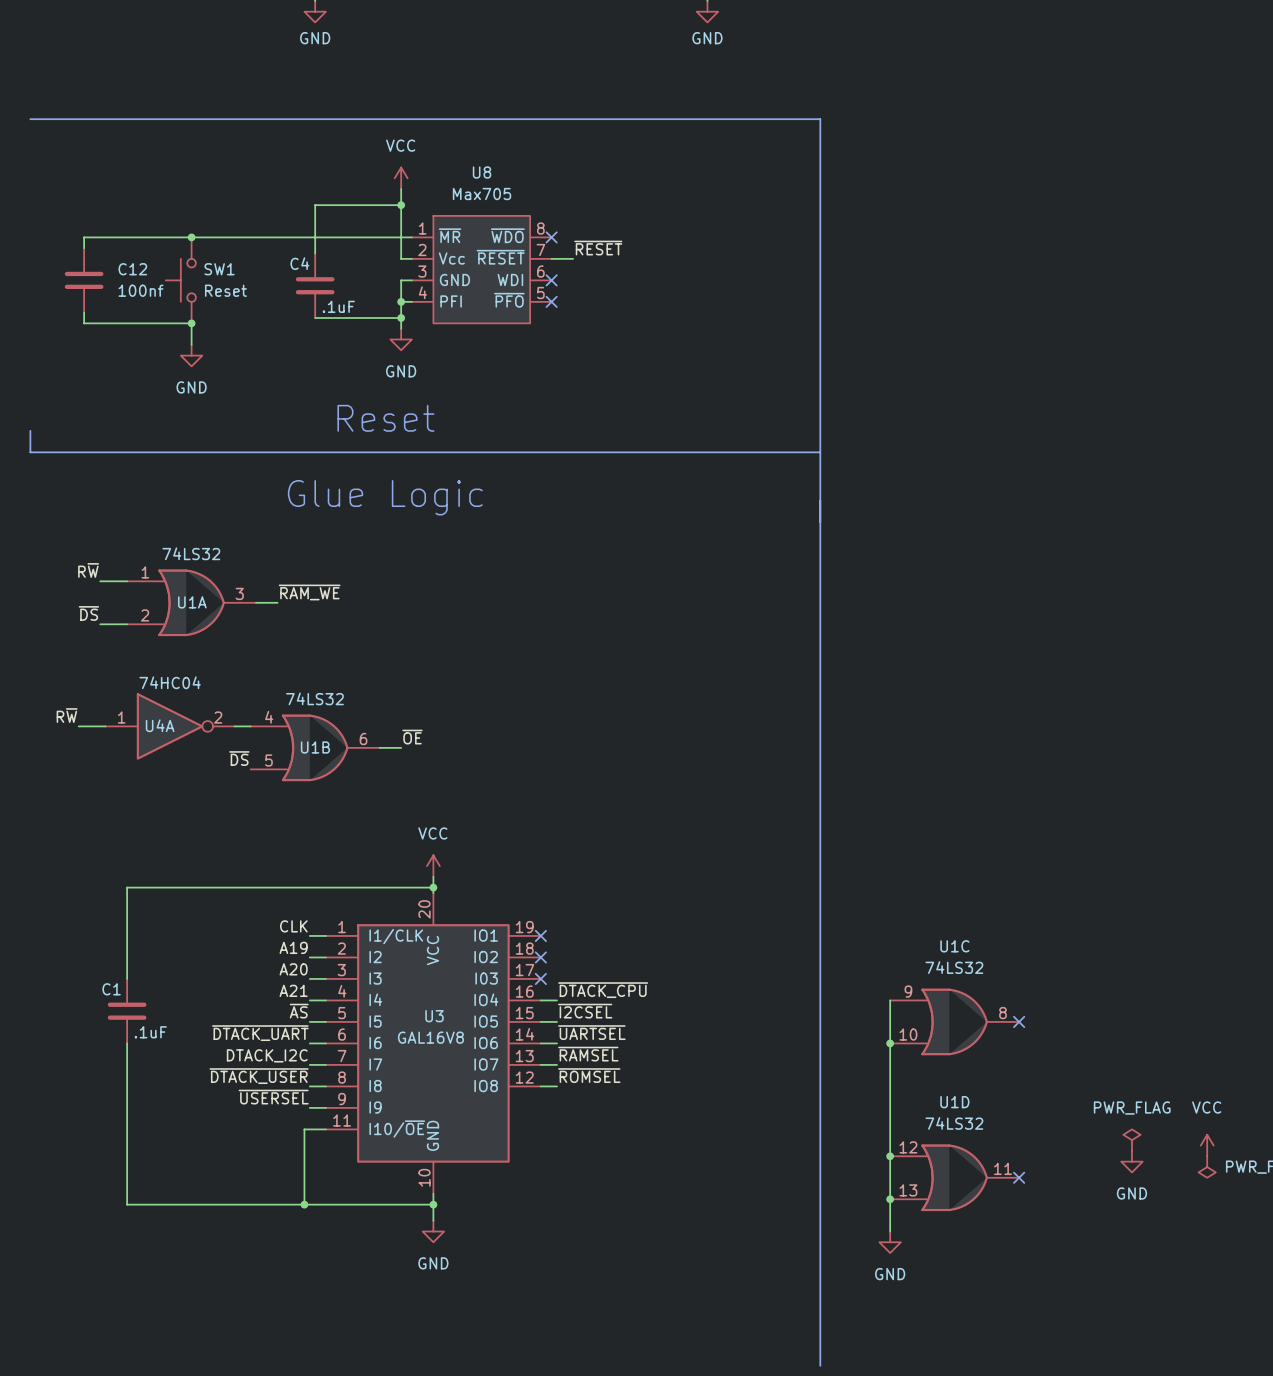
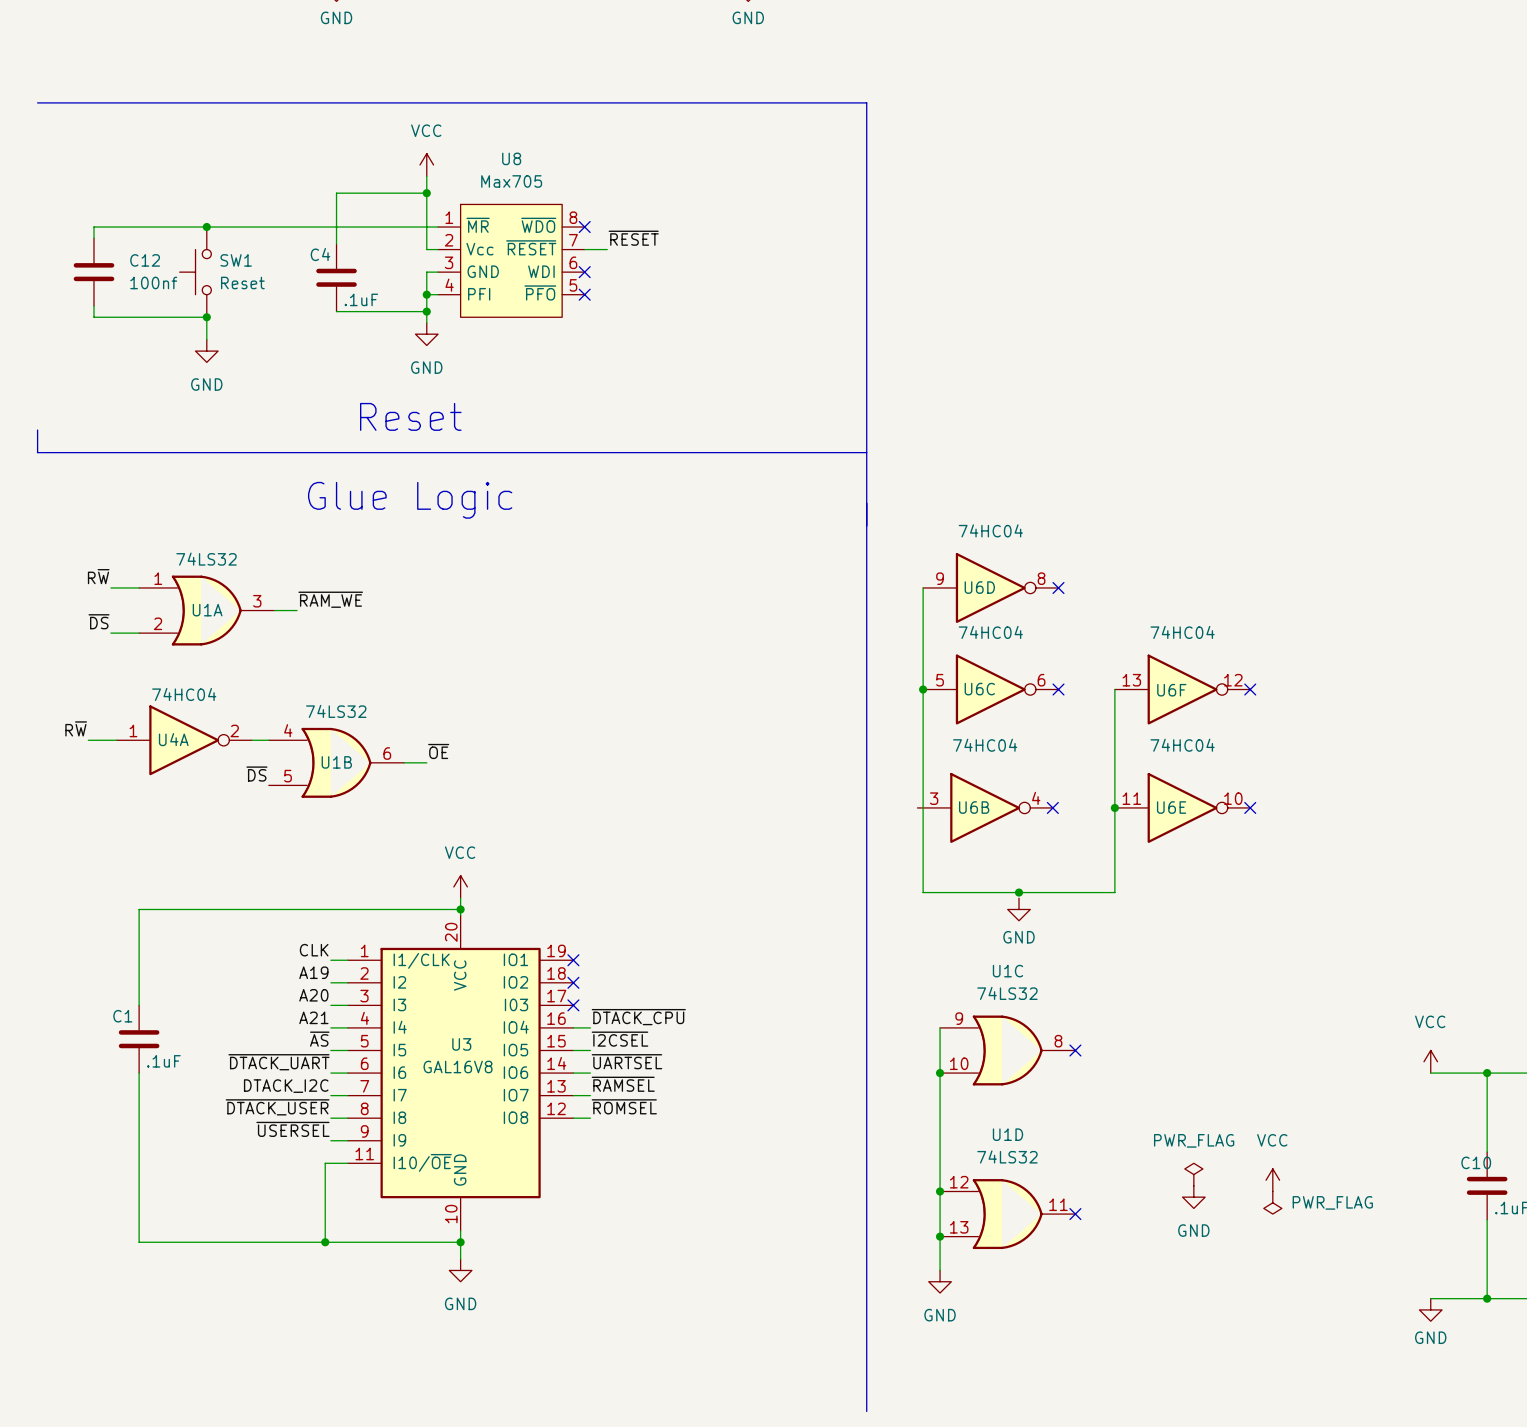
wire: none -> (923, 587) (923, 892) (1114, 892) (1114, 689)
U6D: none -> 74HC04 (990, 587)
no-connect mark: none -> (1058, 587)
junction: none -> (923, 689)
U6C: none -> 74HC04 (990, 689)
no-connect mark: none -> (1058, 689)
U6F: none -> 74HC04 (1182, 689)
no-connect mark: none -> (1250, 689)
U6B: none -> 74HC04 (985, 807)
no-connect mark: none -> (1052, 807)
junction: none -> (1114, 807)
U6E: none -> 74HC04 (1182, 807)
no-connect mark: none -> (1250, 807)
junction: none -> (1019, 892)
power symbol: none -> GND (1019, 909)

